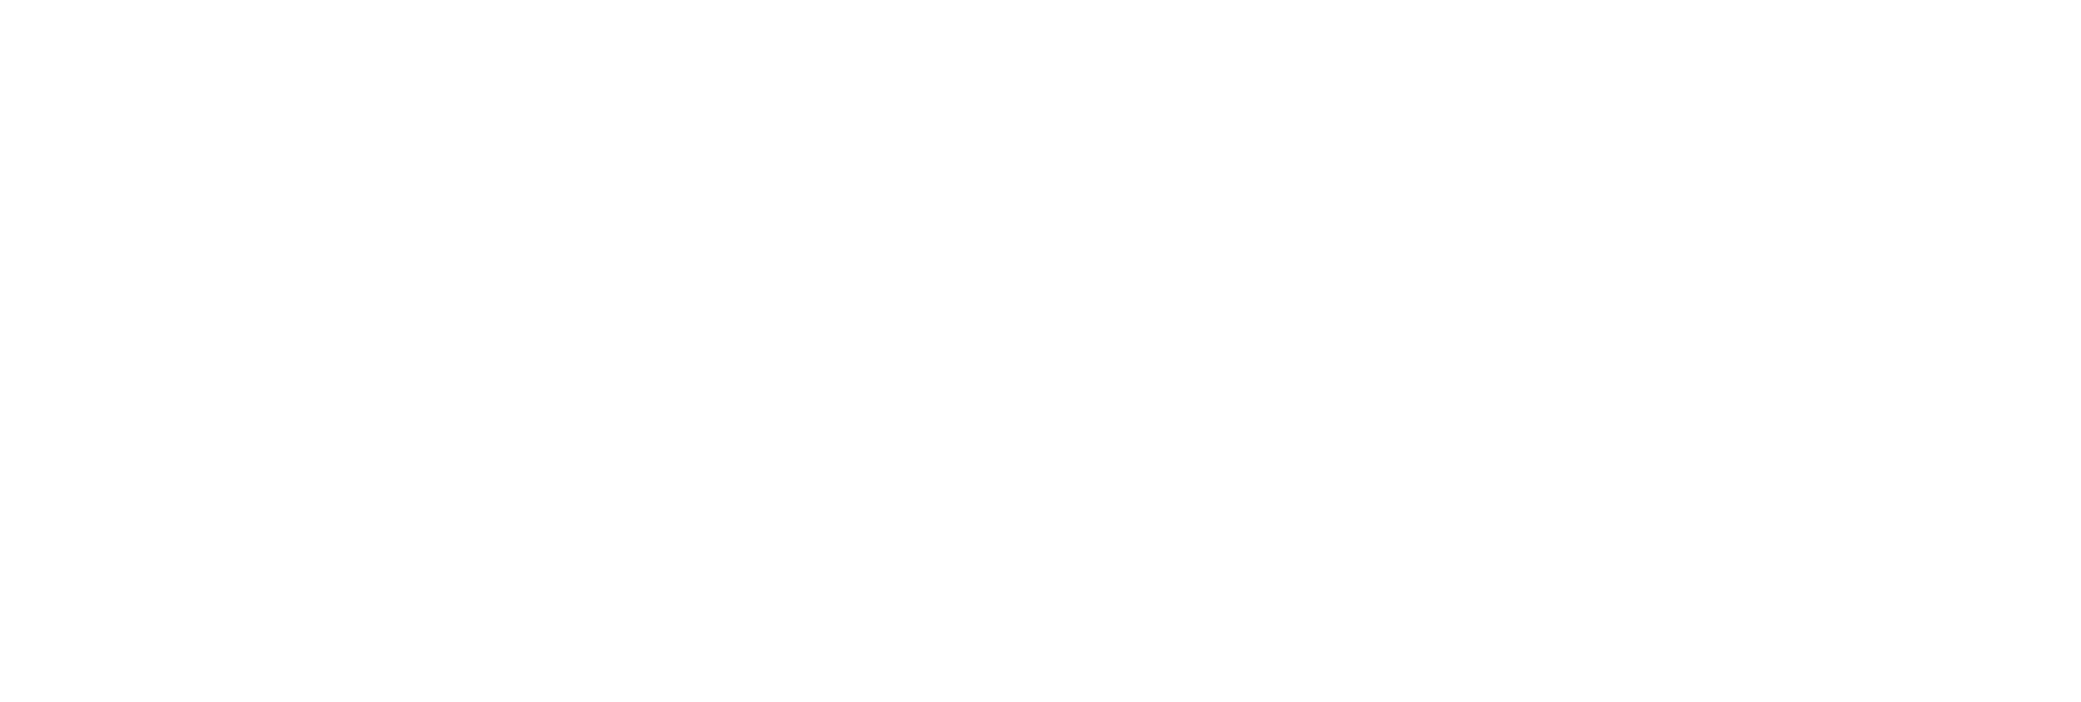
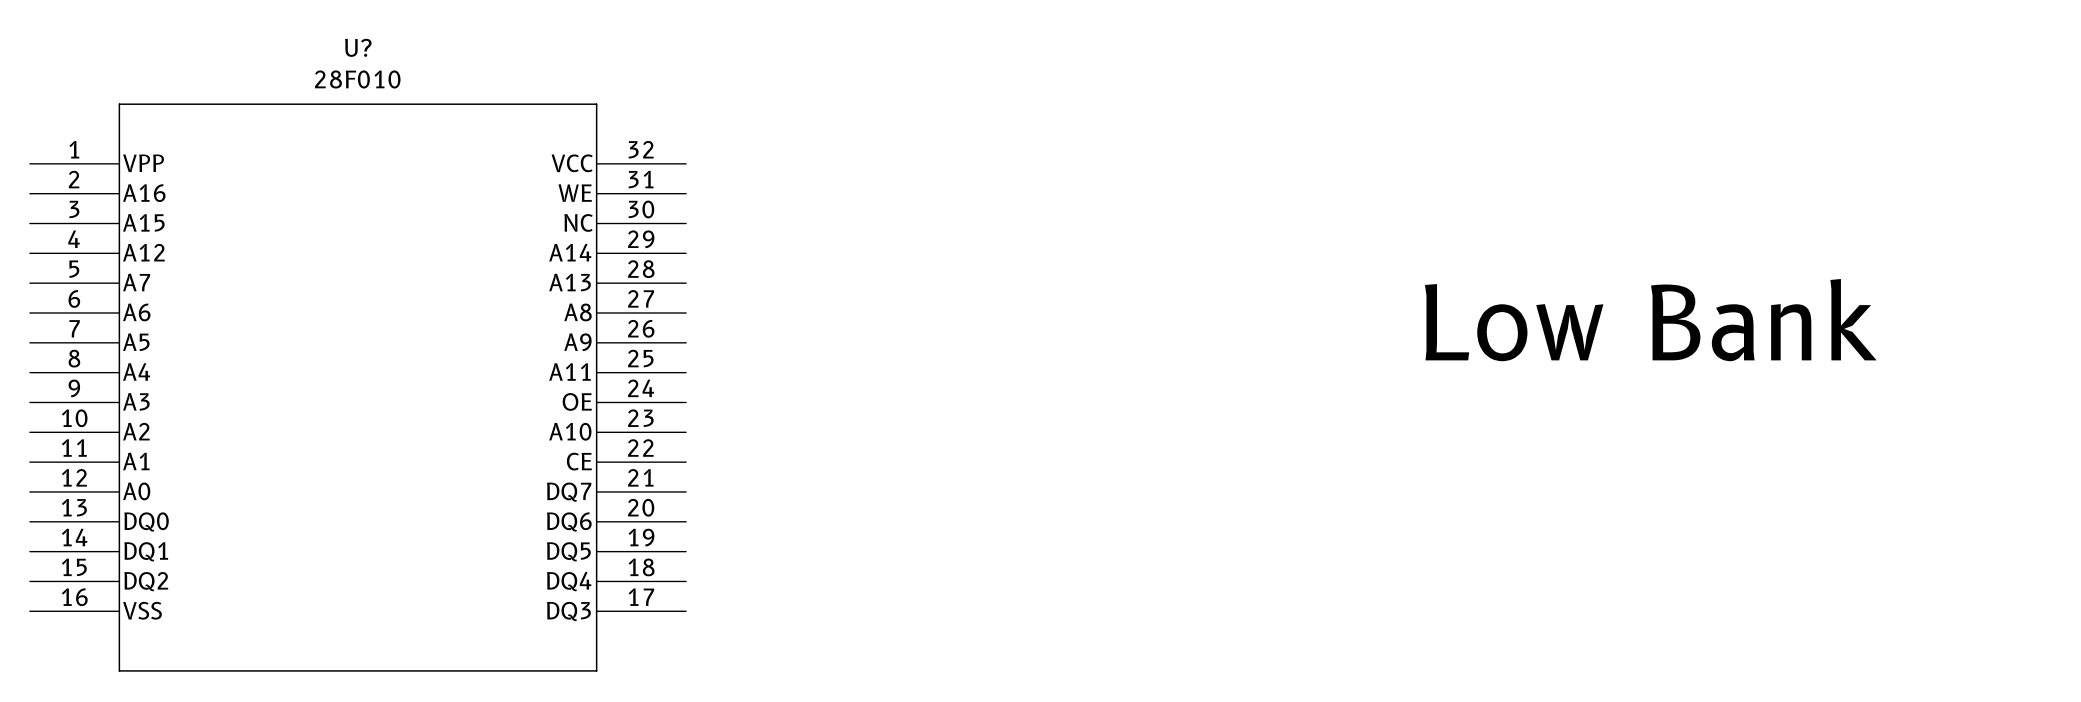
text: none -> Low Bank (1650, 320)
U?: none -> 28F010 (358, 387)

